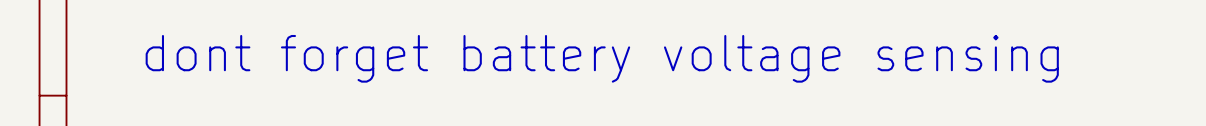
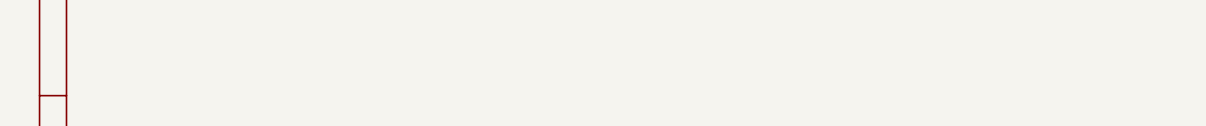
text: dont forget battery voltage sensing (602, 58) -> none

